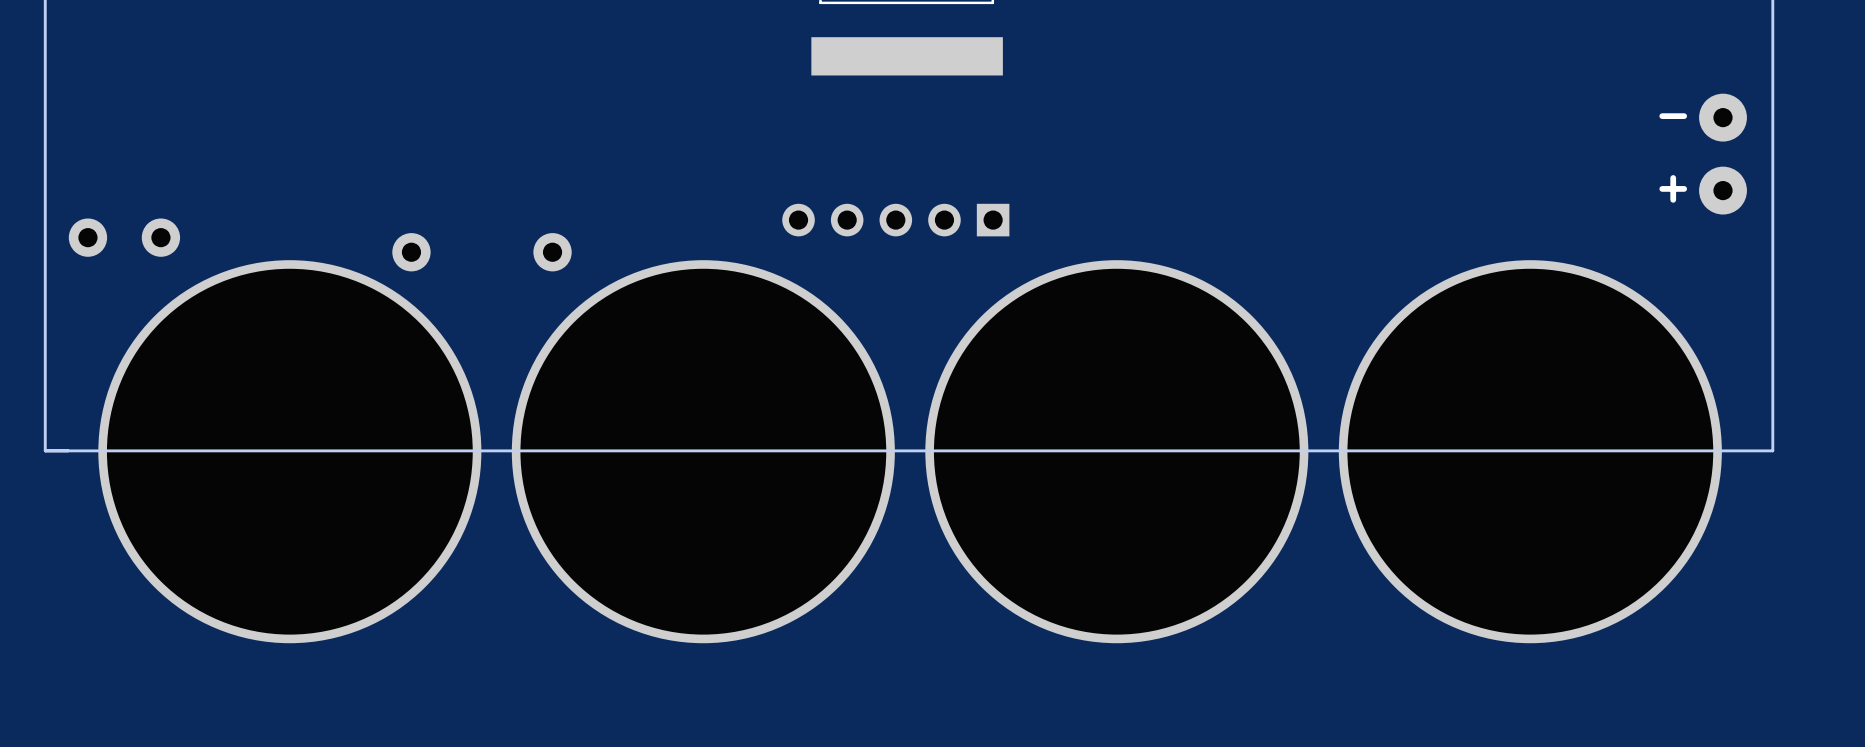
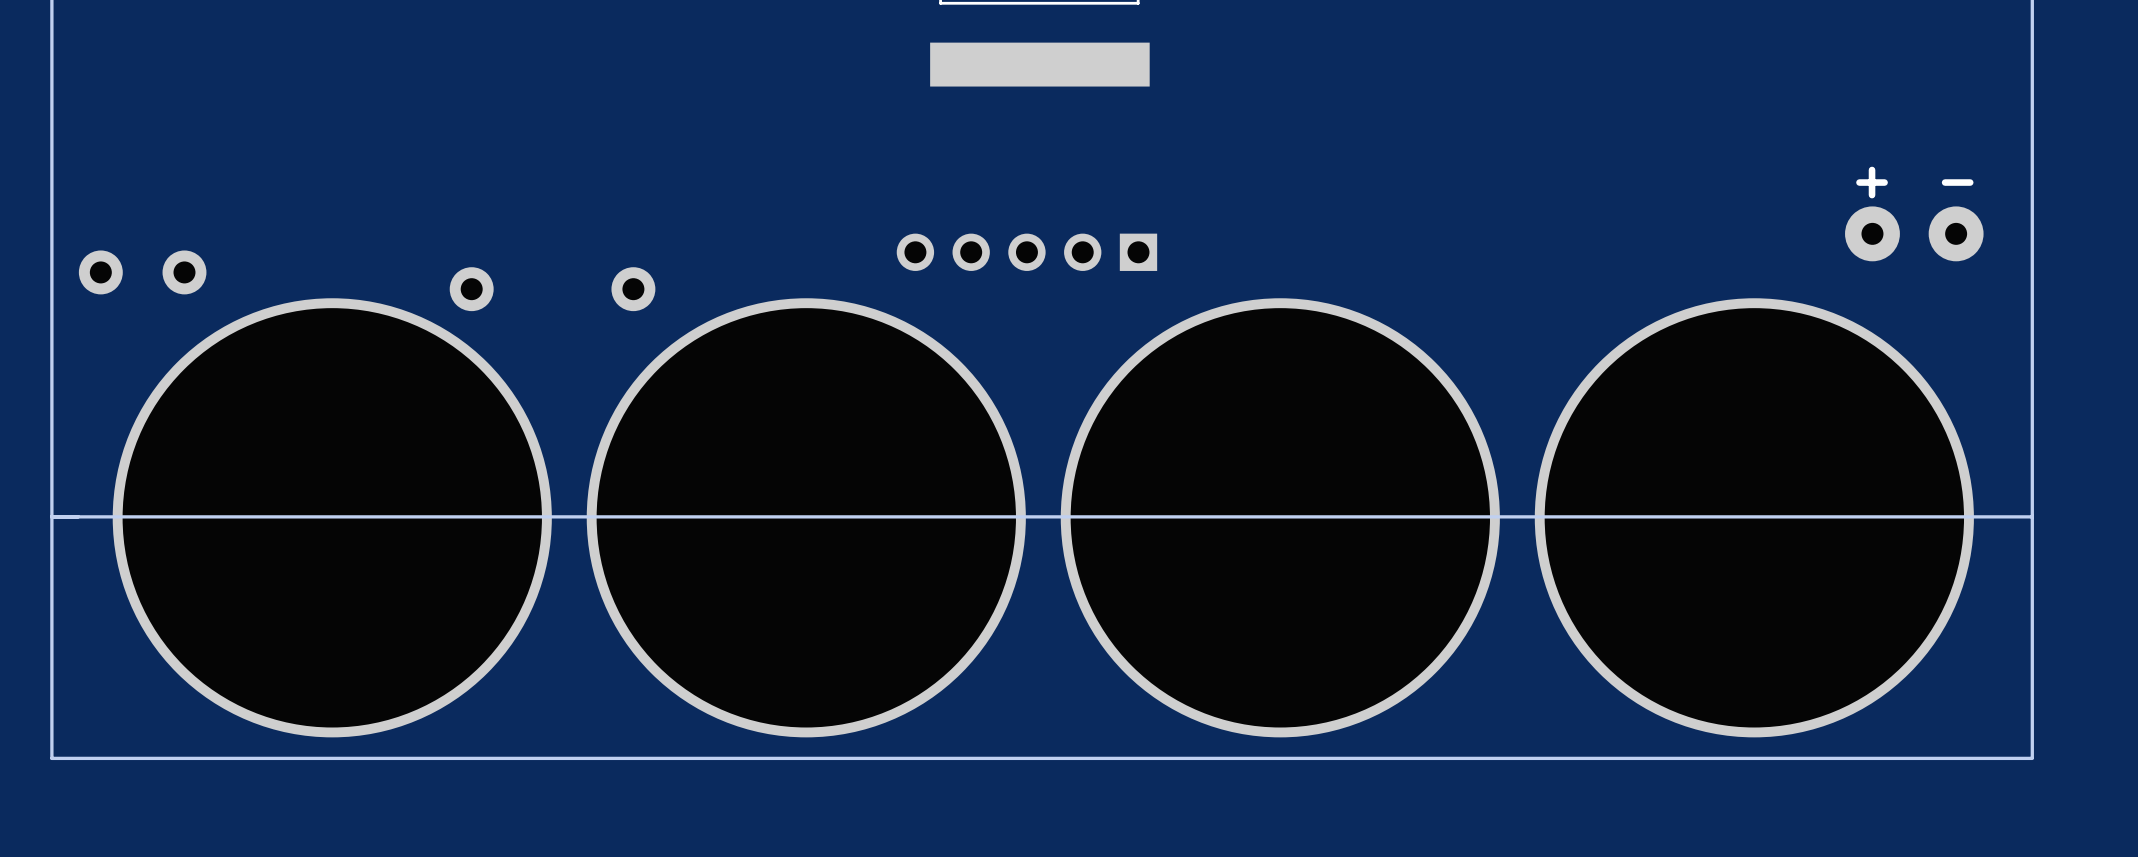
text position: - (1673, 116) -> - (1957, 182)
part rotation: 0° (1723, 154) -> 90° clockwise (1914, 233)
part position: (1723, 154) -> (1914, 233)
text position: + (1673, 188) -> + (1872, 182)
board edge: none -> (51, 516) (51, 758) (2032, 758)
board edge: none -> (2032, 516) (2032, 757)

